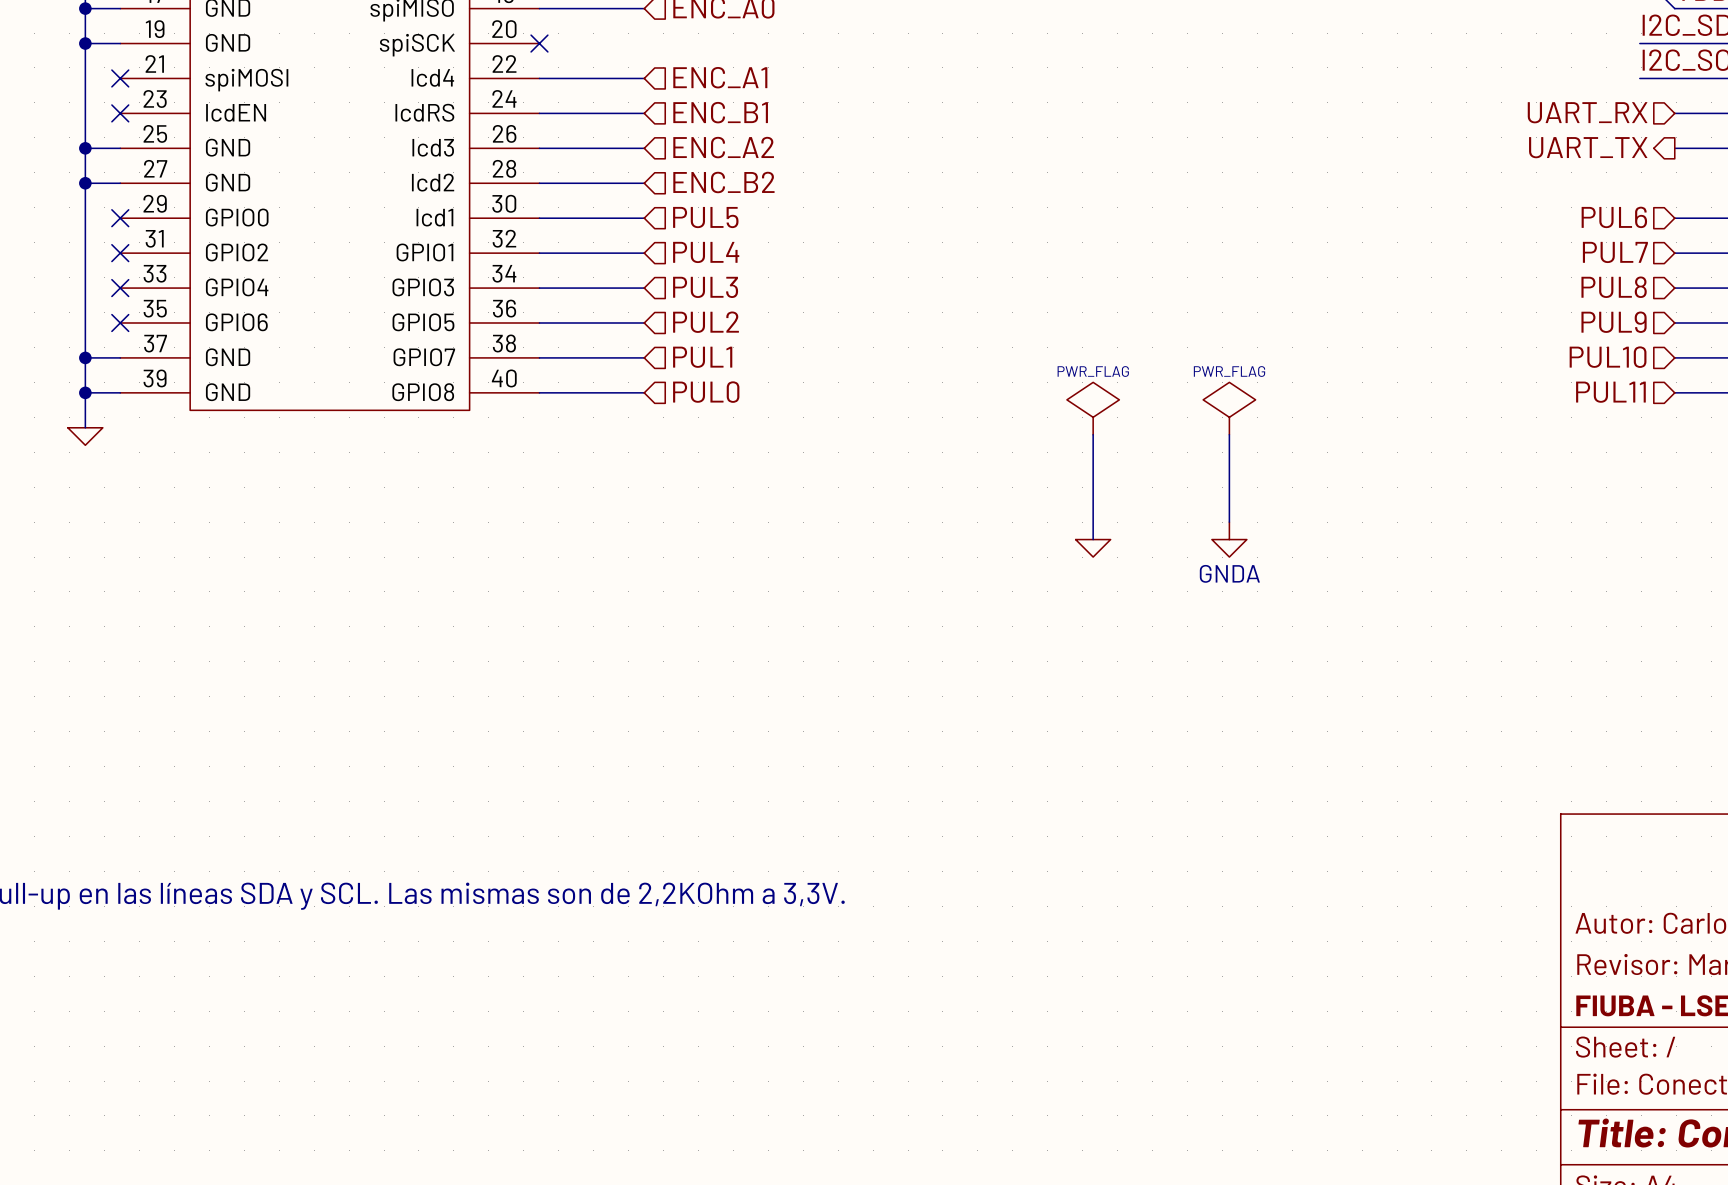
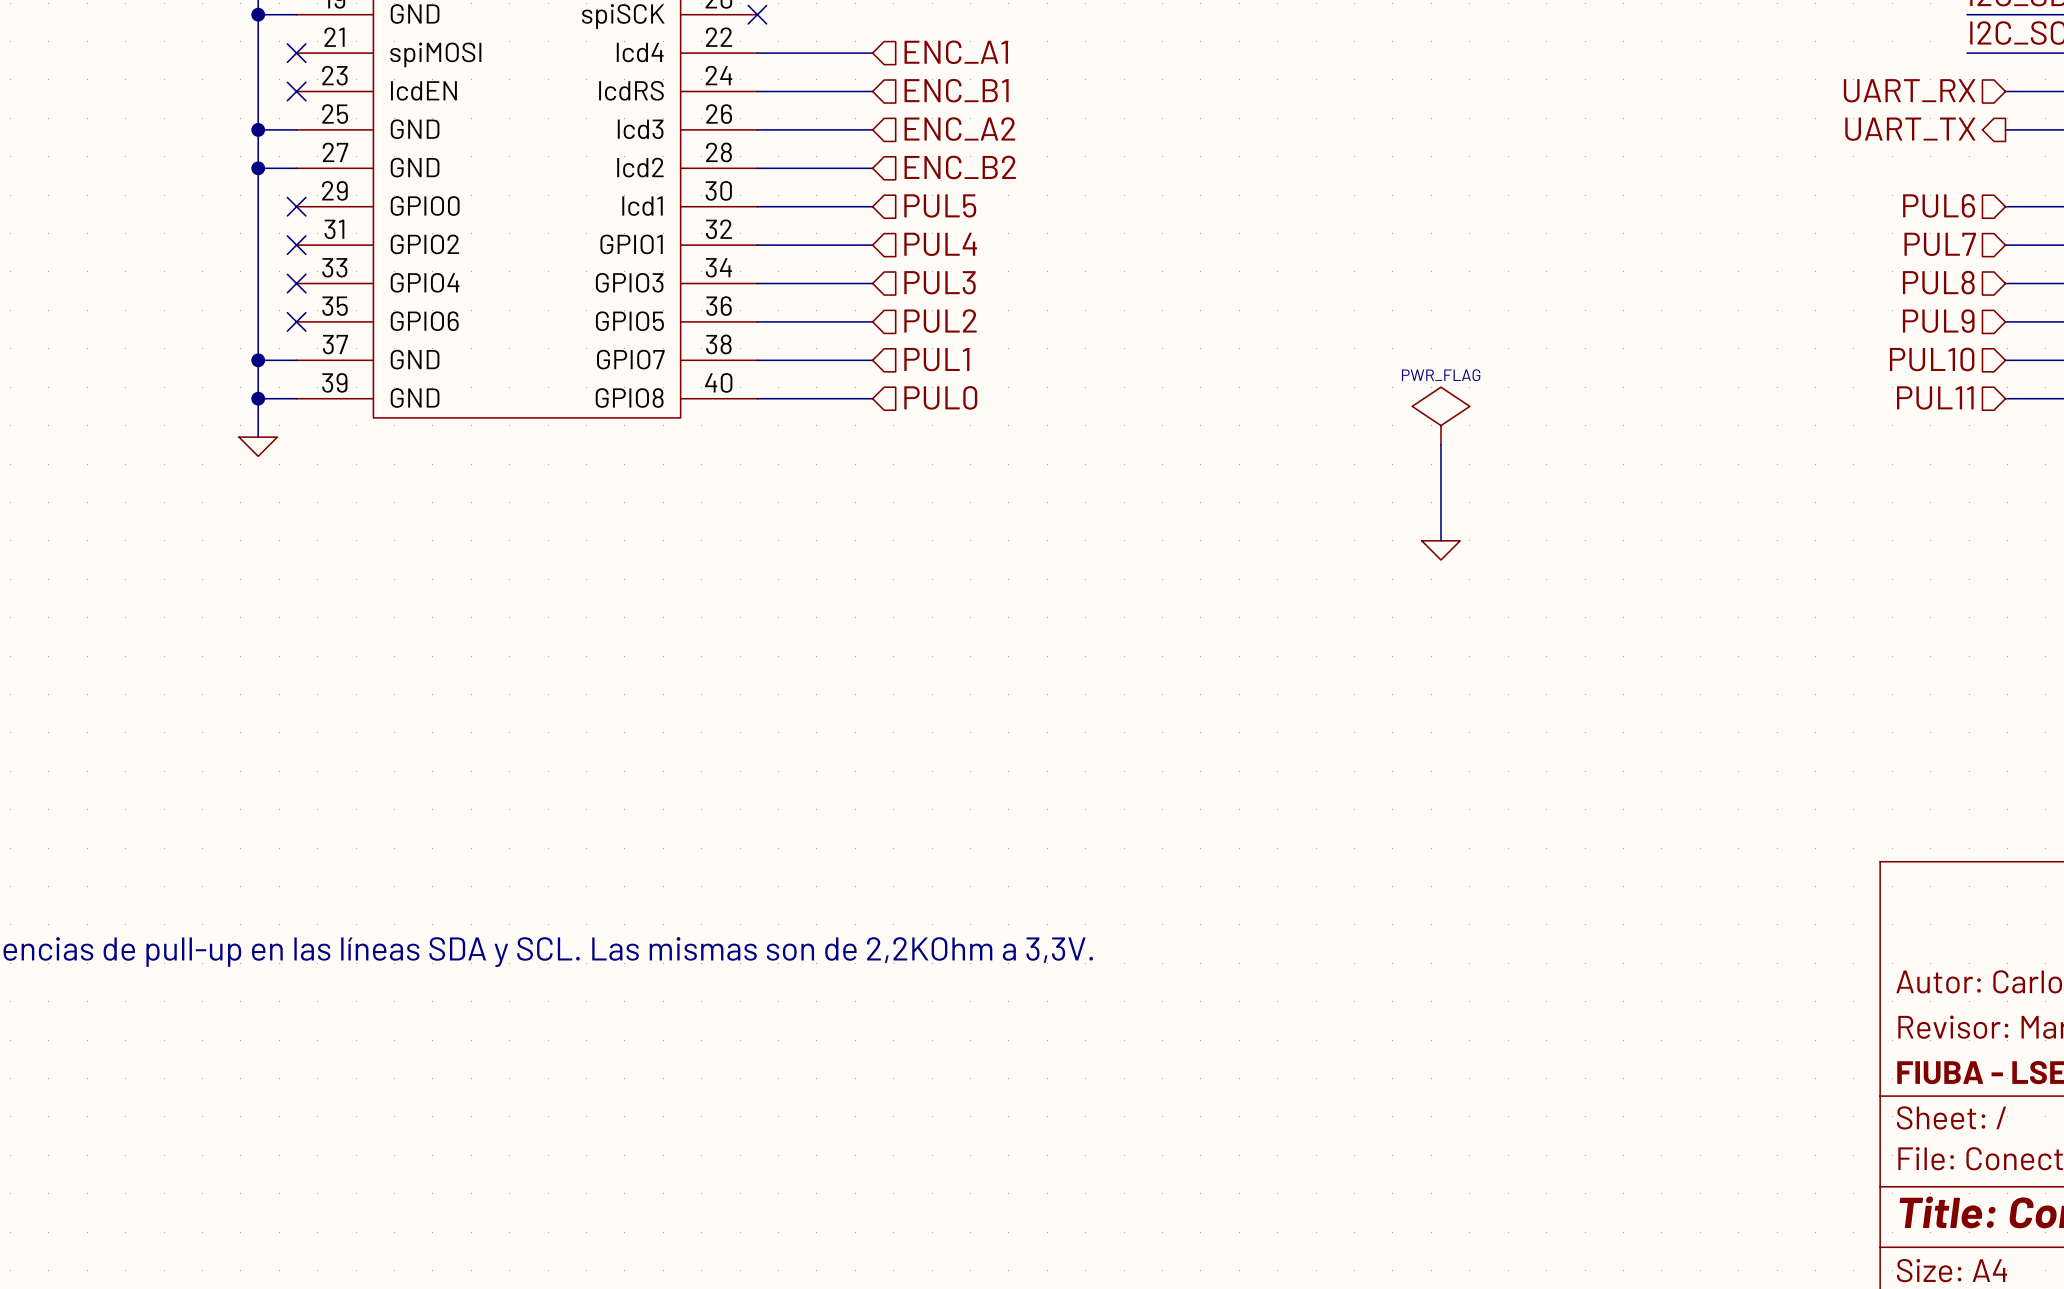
power symbol: PWR_FLAG (1093, 408) -> none
power symbol: none -> PWR_FLAG (1440, 416)
power symbol: PWR_FLAG (1229, 408) -> none
wire: (1093, 434) (1093, 539) -> none
wire: (1229, 434) (1229, 522) -> (1440, 444) (1440, 540)
power symbol: GNDA (1229, 539) -> none
power symbol position: (1093, 548) -> (1440, 550)

